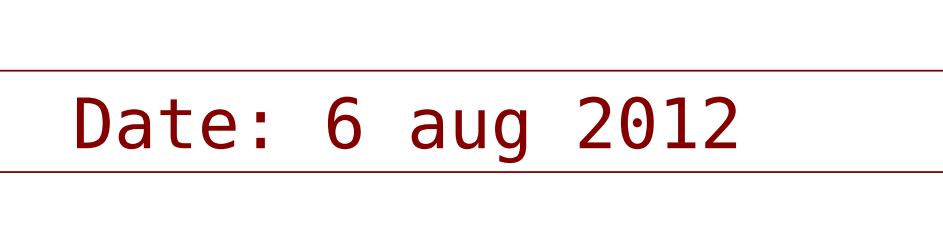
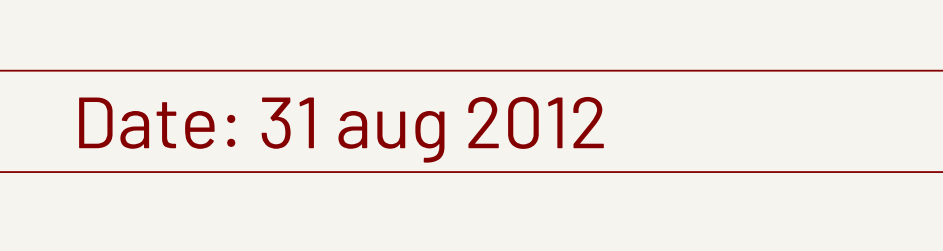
title block: Date: 6 aug 2012 (406, 129) -> Date: 31 aug 2012 (341, 129)

